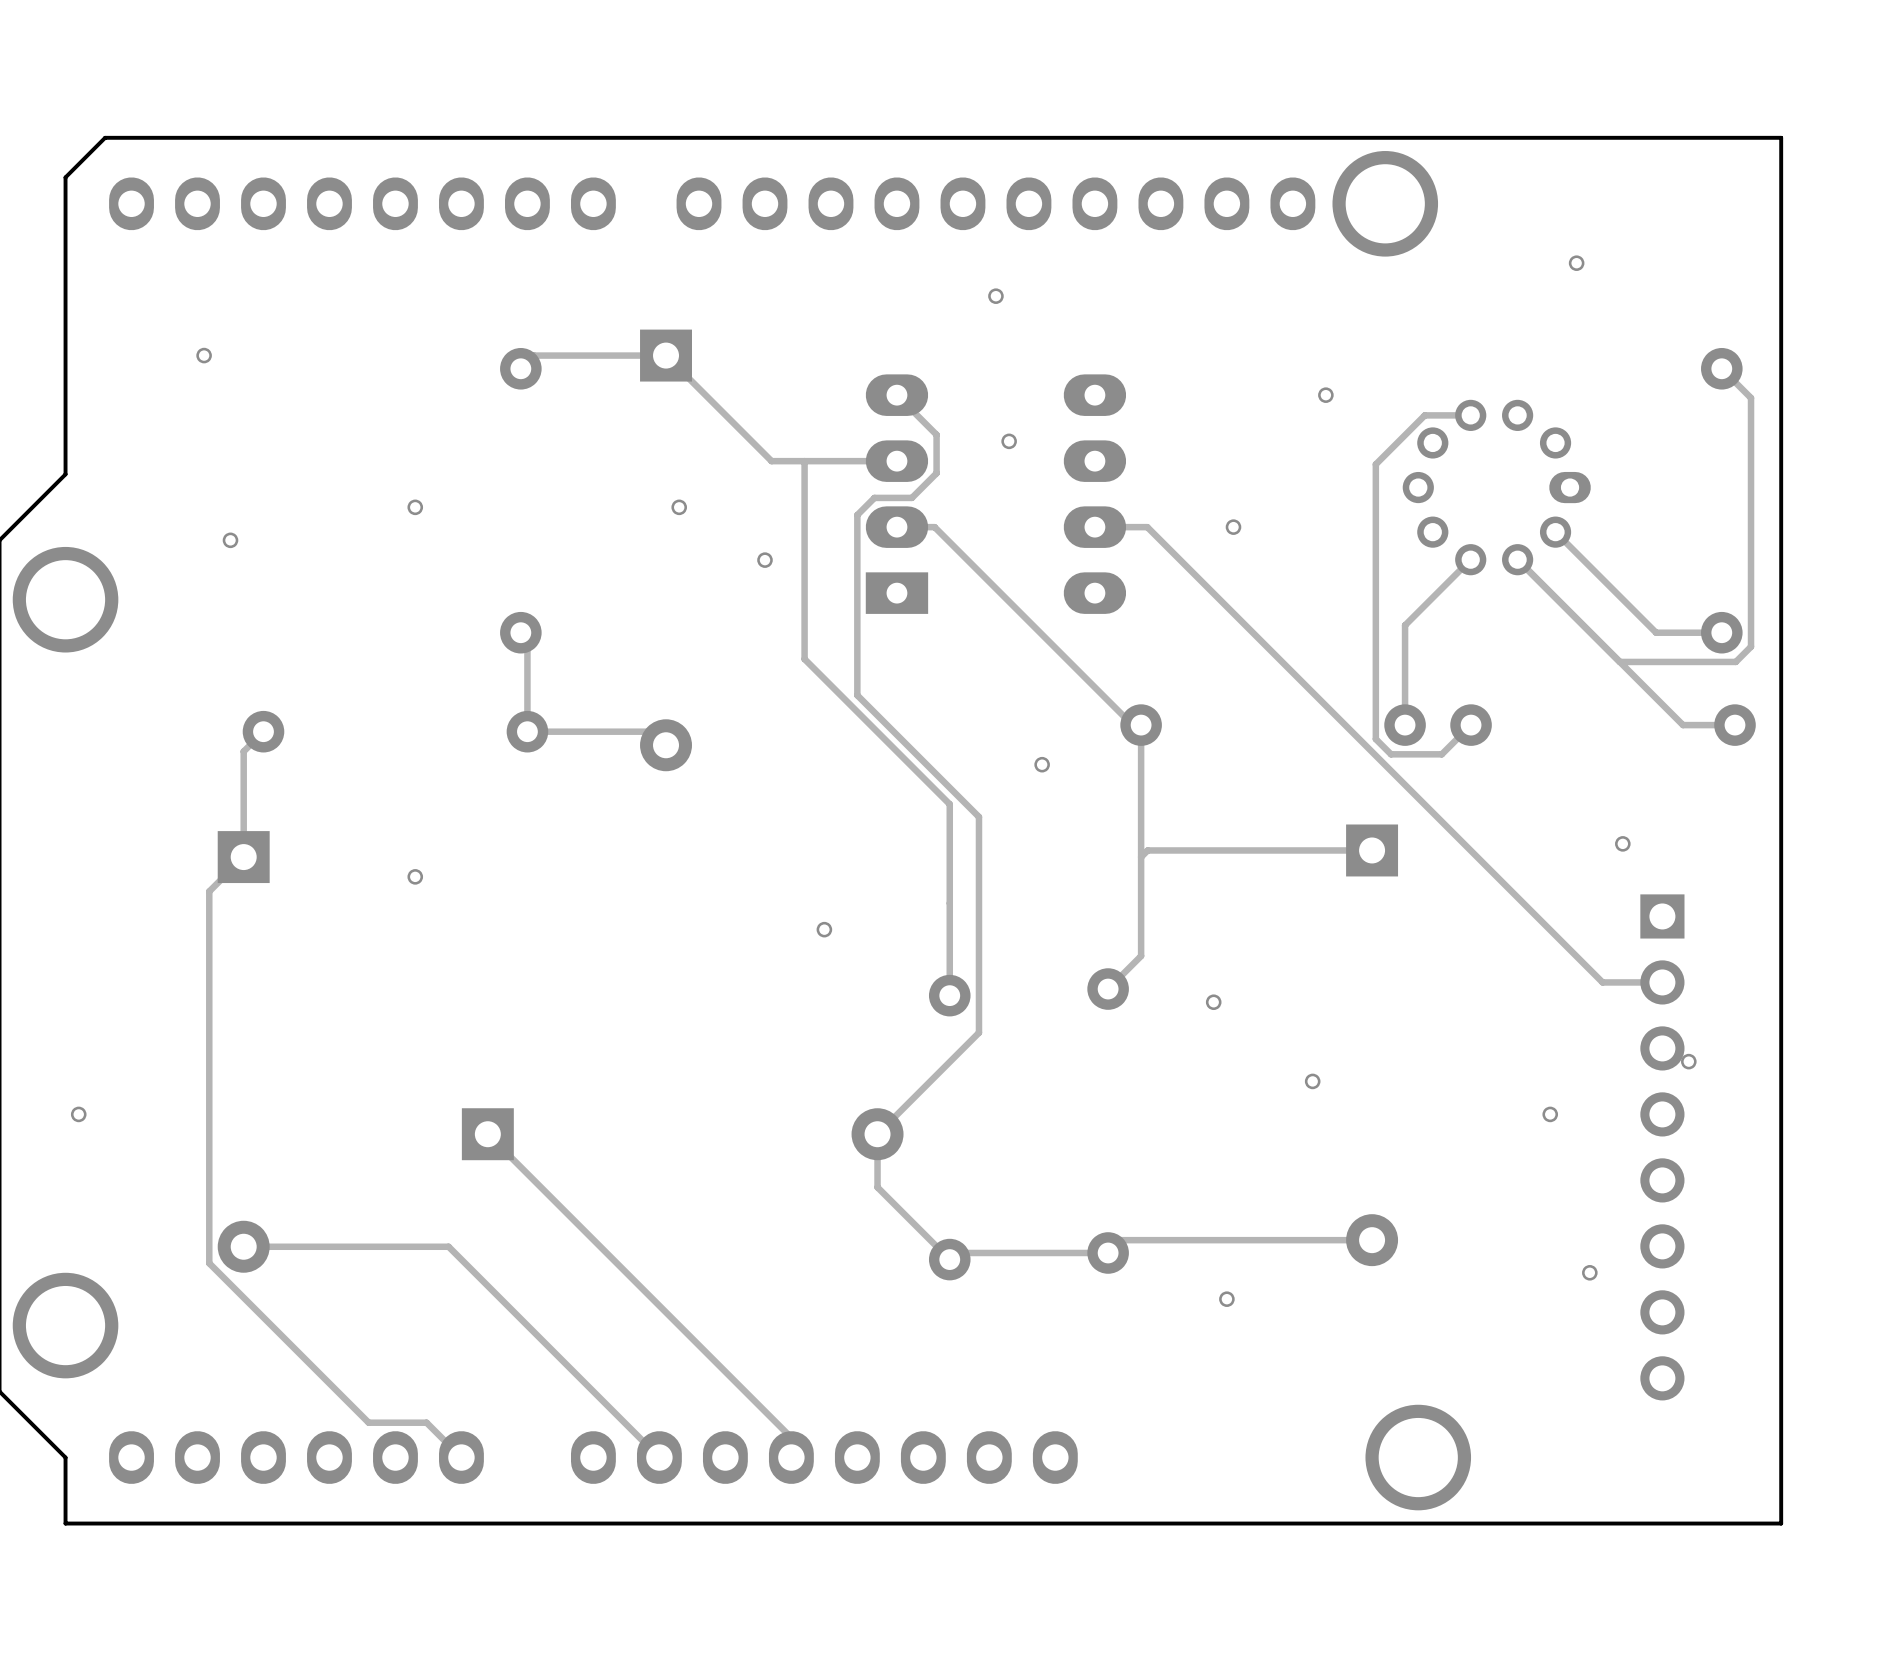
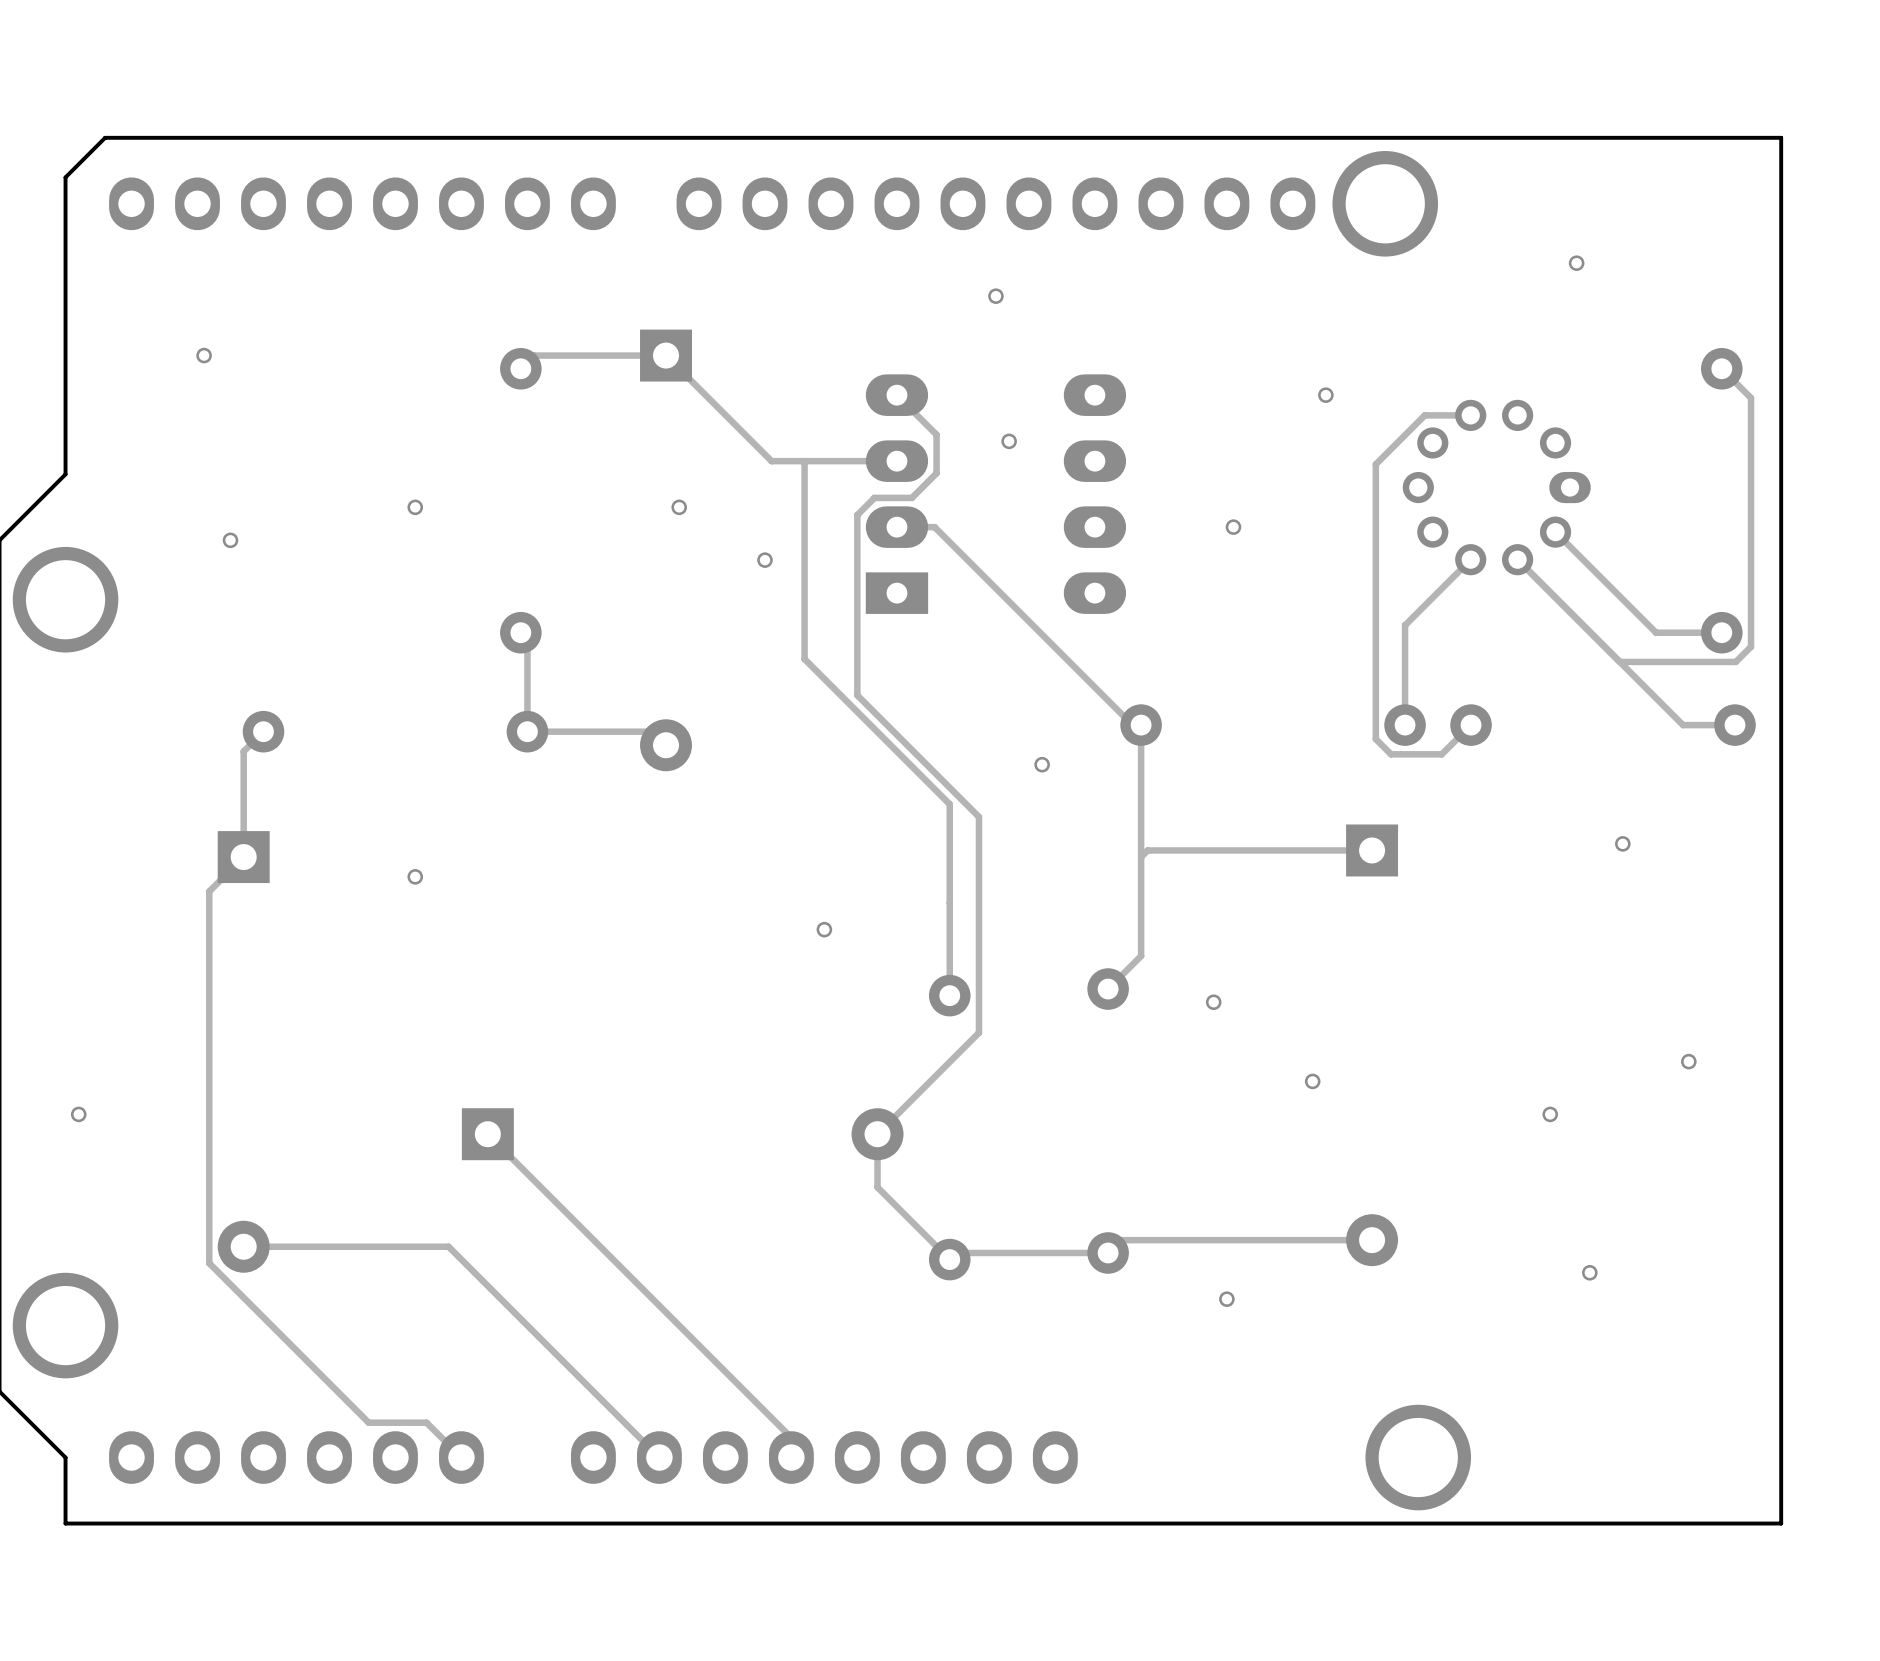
track: (1094, 527) (1147, 527) (1602, 982) (1662, 982) -> none
part: (1662, 1147) -> none

